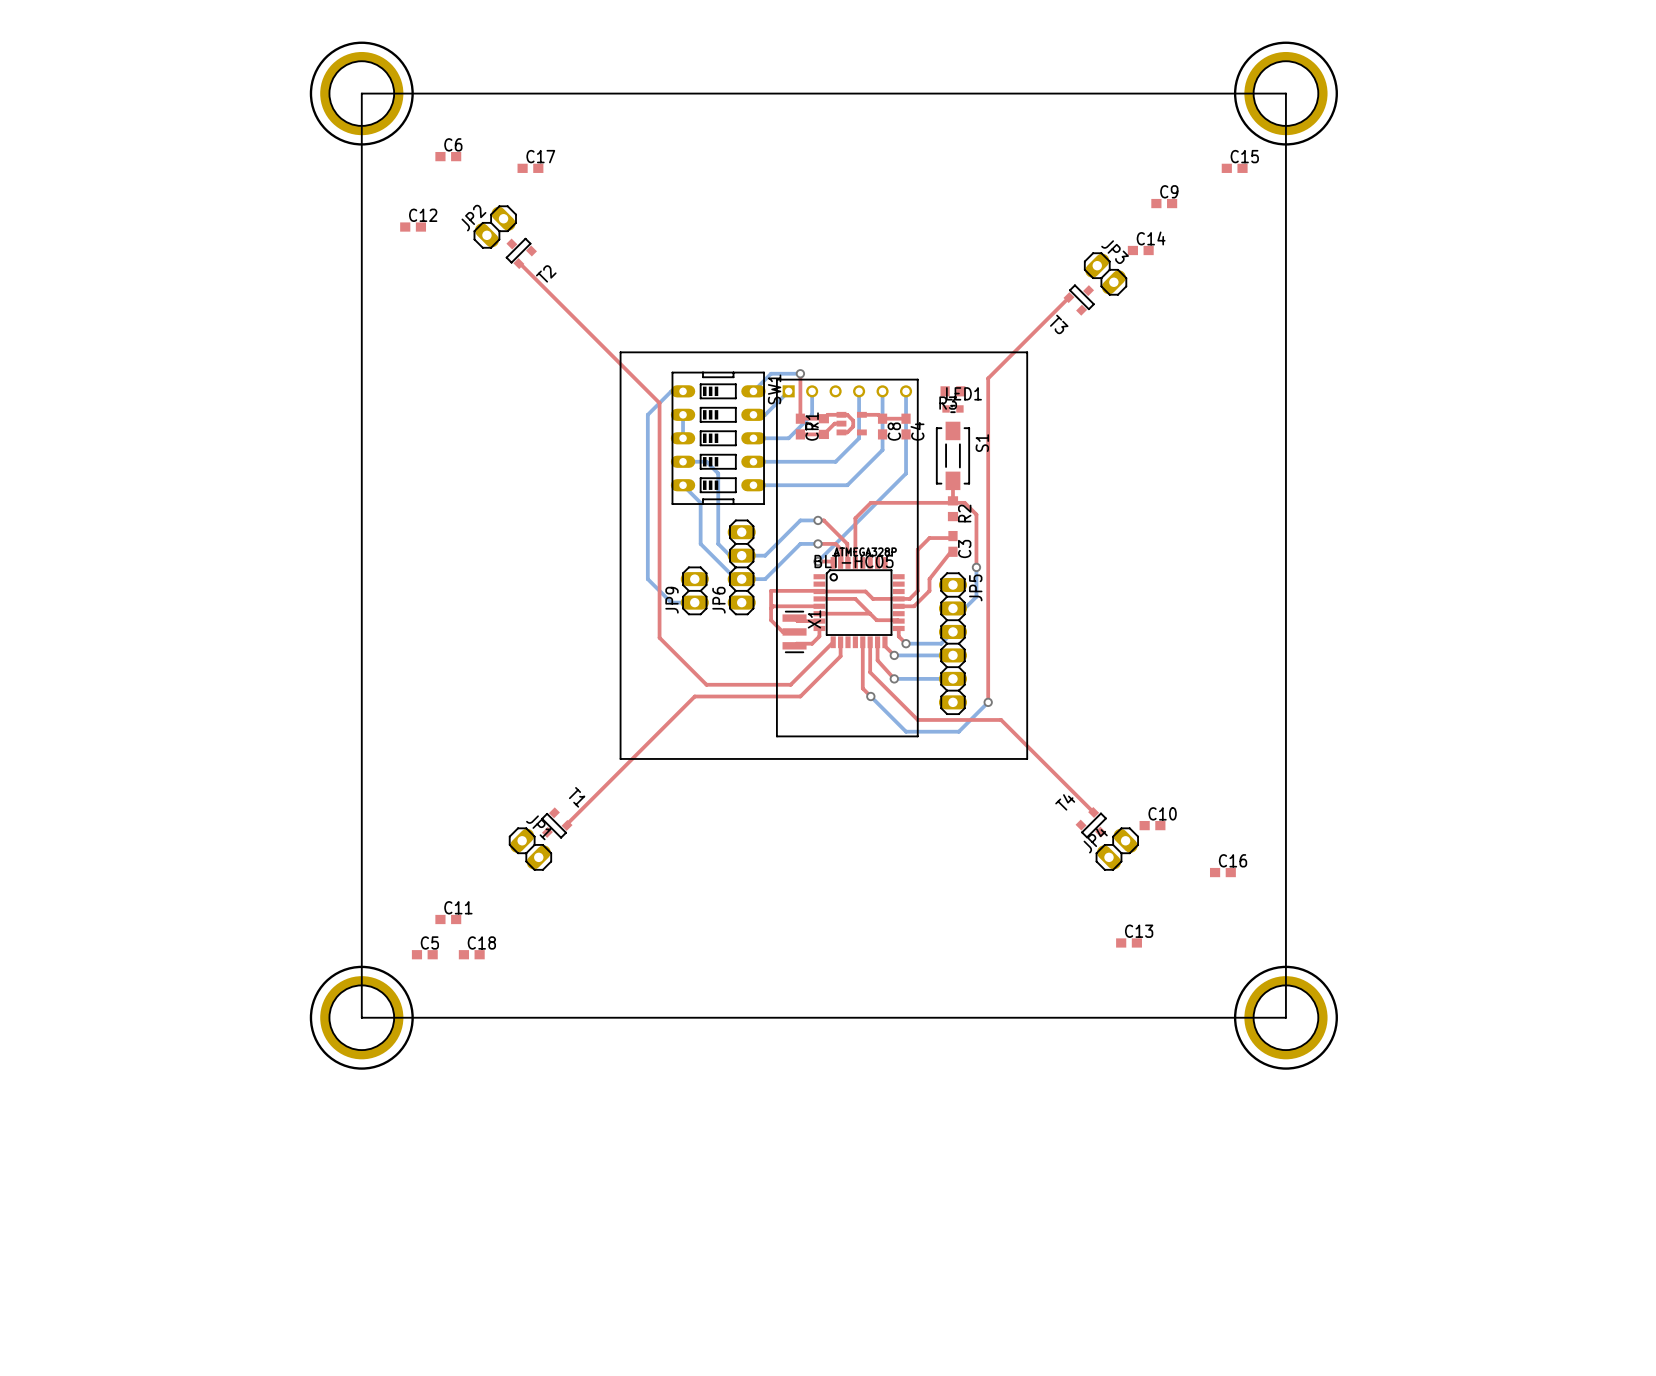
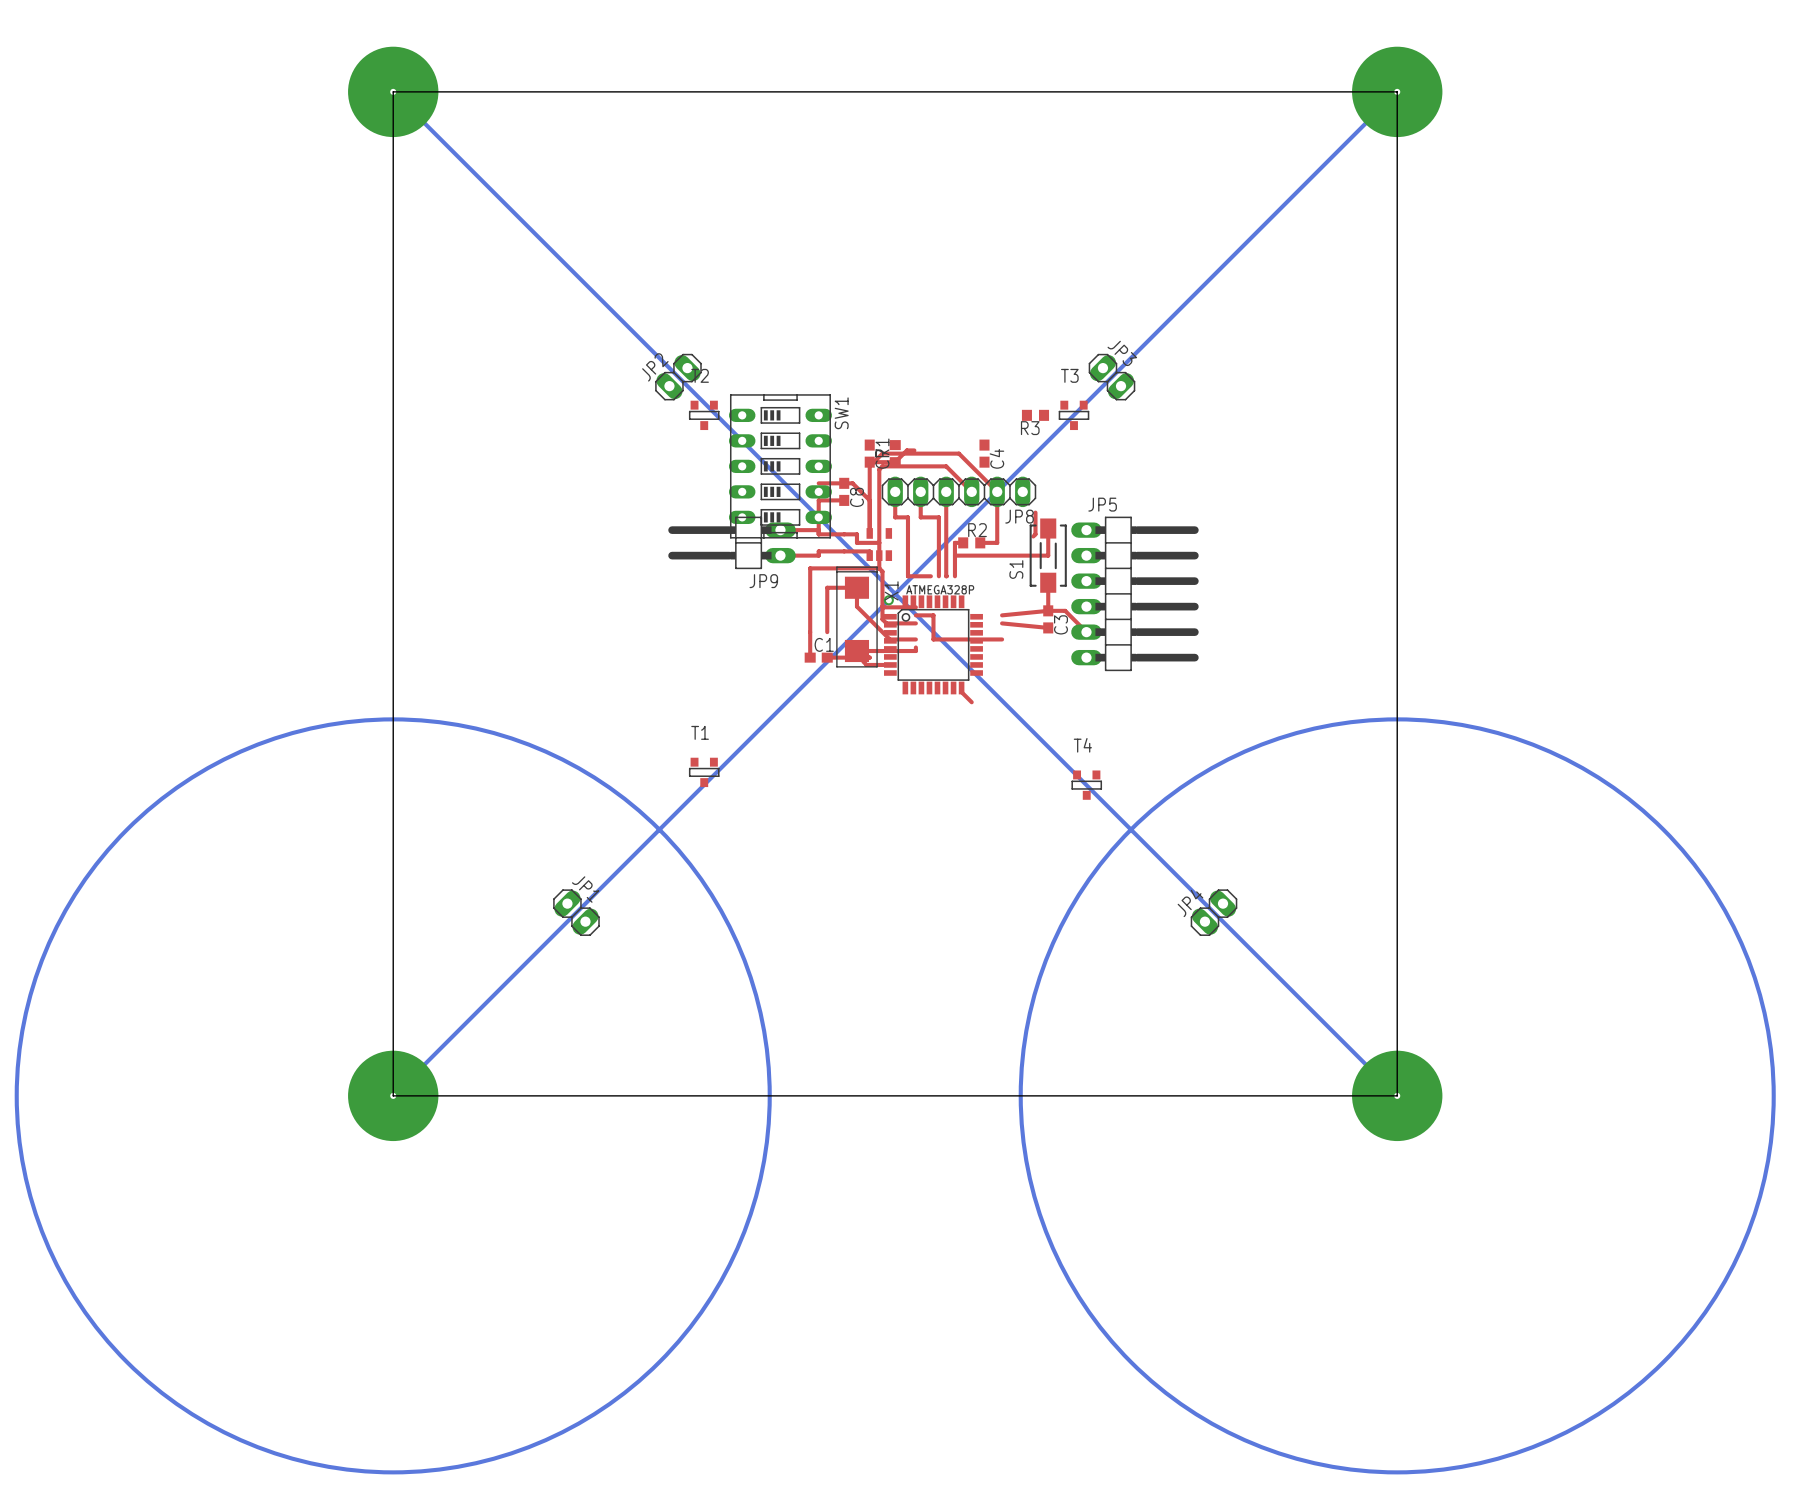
round board edge: [309, 41, 414, 146] -> none
round board edge: [1233, 41, 1338, 146] -> none
bottom track: none -> (393, 91) (1397, 1095)
hole: (361, 93) -> none
hole: (1285, 93) -> none
C6: (448, 156) -> none
C17: (530, 168) -> none
C15: (1234, 168) -> none
C9: (1164, 203) -> none
C12: (413, 227) -> none
JP2 position: (495, 227) -> (678, 377)
C14: (1140, 250) -> none
T2 rotation: 0° (521, 253) -> 135° counterclockwise (704, 415)
T2 position: (521, 253) -> (704, 415)
top track: (518, 263) (659, 403) (659, 637) (706, 684) (790, 684) (833, 642) -> none
JP3 position: (1105, 273) -> (1111, 377)
top track: (1068, 297) (988, 378) (988, 702) -> none
T3 rotation: 0° (1079, 300) -> 135° clockwise (1073, 415)
T3 position: (1079, 300) -> (1073, 415)
board edge: (620, 352) (1027, 352) (1027, 758) (620, 758) (620, 352) -> none
top track: (800, 373) (800, 418) (823, 418) (827, 414) (847, 414) (853, 420) (853, 426) (847, 432) (841, 432) -> none
bottom track: (800, 373) (771, 373) (753, 391) -> none
via: (800, 373) -> none
bottom track: (683, 391) (671, 391) (647, 414) (647, 579) (671, 602) (694, 602) -> none
bottom track: (788, 391) (765, 414) (753, 414) -> none
bottom track: (812, 391) (812, 414) (788, 438) (753, 438) -> none
bottom track: (859, 391) (859, 438) (835, 461) (753, 461) -> none
bottom track: (882, 391) (882, 450) (847, 485) (753, 485) -> none
bottom track: (906, 391) (906, 473) -> (1397, 91) (984, 504)
LED1: (952, 408) -> none
bottom track: (683, 414) (683, 438) -> none
top track: (861, 414) (878, 414) (882, 418) (906, 418) -> none
part rotation: 0° (851, 423) -> 90° counterclockwise (879, 544)
part position: (851, 423) -> (879, 544)
C8 position: (882, 426) -> (844, 491)
top track: none -> (818, 483) (852, 483) (869, 500)
S1 rotation: 0° (952, 455) -> 180° (1048, 555)
S1 position: (952, 455) -> (1048, 555)
bottom track: (683, 461) (706, 461) (718, 473) (718, 543) (729, 555) (765, 555) (800, 520) (818, 520) -> none
top track: none -> (895, 491) (895, 517) (907, 517) (907, 576) (930, 576)
top track: none -> (920, 491) (920, 517) (938, 517) (938, 576)
top track: none -> (946, 491) (946, 576)
JP8: none -> (958, 491)
top track: none -> (971, 491) (946, 466) (882, 466) (879, 469) (879, 568)
top track: none -> (844, 500) (818, 500) (818, 534) (856, 534) (856, 542) (879, 542)
bottom track: (683, 485) (700, 502) (700, 543) (735, 579) (765, 579) (800, 543) (818, 543) -> none
top track: none -> (1048, 528) (1048, 555) (954, 555)
top track: none -> (780, 530) (818, 530)
top track: none -> (869, 533) (869, 466) (882, 453) (958, 453) (997, 491) (997, 542) (980, 542)
top track: none -> (963, 542) (954, 542) (954, 576)
R2 rotation: 0° (952, 508) -> 90° clockwise (971, 542)
R2 position: (952, 508) -> (971, 542)
R2 name position: R2 (964, 513) -> R2 (977, 530)
top track: none -> (780, 555) (818, 555) (818, 551) (869, 551) (869, 555)
top track: (818, 520) (823, 520) (847, 543) (848, 562) -> none
via: (818, 520) -> none
top track: none -> (879, 568) (810, 568) (810, 657)
top track: none -> (879, 568) (882, 571) (882, 619) (886, 623) (915, 623)
top track: (952, 536) (951, 538) (929, 538) (917, 549) (917, 590) (909, 598) (873, 598) (865, 591) (771, 590) (771, 620) (782, 631) (794, 631) -> none
top track: (818, 543) (835, 543) (841, 549) (840, 562) -> none
via: (818, 543) -> none
C3 position: (952, 543) -> (1048, 619)
top track: none -> (1048, 582) (1048, 610)
top track: (952, 551) (951, 551) (929, 579) (929, 590) (914, 606) (898, 606) -> none
part: (847, 558) -> none
top track: (818, 561) (833, 562) -> none
bottom track: none -> (888, 600) (393, 1095)
top track: (855, 562) (855, 518) (870, 502) (964, 502) (976, 514) (976, 567) -> none
JP9 footprint: [680, 566, 709, 616] -> [668, 516, 796, 570]
JP6: (741, 567) -> none
top track: none -> (882, 606) (915, 607)
bottom track: (976, 567) (976, 596) (964, 608) (952, 608) -> none
via: (976, 567) -> none
top track: none -> (1048, 610) (1065, 610) (1086, 632)
top track: none -> (1048, 610) (1002, 615)
JP5 footprint: [938, 572, 968, 715] -> [1071, 516, 1199, 672]
top track: none -> (915, 615) (933, 615) (933, 639) (1002, 639)
top track: none -> (1002, 623) (1048, 627)
JP5 name position: JP5 (975, 587) -> JP5 (1102, 504)
top track: none -> (827, 632) (827, 587) (856, 587) (856, 606) (889, 639) (915, 639)
top track: (819, 598) (855, 598) (876, 620) (898, 621) -> none
JP9 name position: JP9 (672, 600) -> JP9 (763, 581)
top track: none -> (915, 647) (915, 651) (856, 651) (869, 657) (827, 657)
top track: (819, 606) (773, 606) (771, 608) -> none
X1 footprint: [782, 611, 807, 653] -> [836, 566, 878, 668]
top track: (819, 613) (870, 613) -> none
C1: none -> (818, 657)
top track: (819, 628) (819, 636) (812, 643) (796, 643) (794, 645) -> none
top track: (898, 628) (898, 636) (906, 643) -> none
bottom track: (952, 631) (941, 643) (906, 643) -> none
top track: (840, 642) (840, 656) (800, 696) (694, 696) (567, 825) -> none
top track: (862, 642) (862, 688) (870, 696) -> none
top track: (870, 642) (870, 672) (917, 719) (1001, 719) (1093, 812) -> none
top track: (877, 642) (877, 660) (894, 678) -> none
via: (906, 643) -> none
bottom track: (894, 655) (952, 655) -> none
via: (894, 655) -> none
drawing: none -> [14, 717, 772, 1475]
drawing: none -> [1018, 717, 1776, 1475]
bottom track: (894, 678) (952, 678) -> none
via: (894, 678) -> none
bottom track: (870, 696) (906, 731) (958, 731) (988, 702) -> none
via: (870, 696) -> none
via: (988, 702) -> none
T1 rotation: 0° (556, 822) -> 45° counterclockwise (704, 772)
T1 position: (556, 822) -> (704, 772)
T4 rotation: 0° (1091, 822) -> 45° clockwise (1086, 785)
T4 position: (1091, 822) -> (1086, 785)
C10: (1152, 825) -> none
C16: (1222, 872) -> none
C11: (448, 919) -> none
C13: (1129, 942) -> none
C5: (424, 954) -> none
C18: (471, 954) -> none
round board edge: [309, 965, 414, 1070] -> none
round board edge: [1233, 965, 1338, 1070] -> none
hole: (361, 1017) -> none
hole: (1285, 1017) -> none

